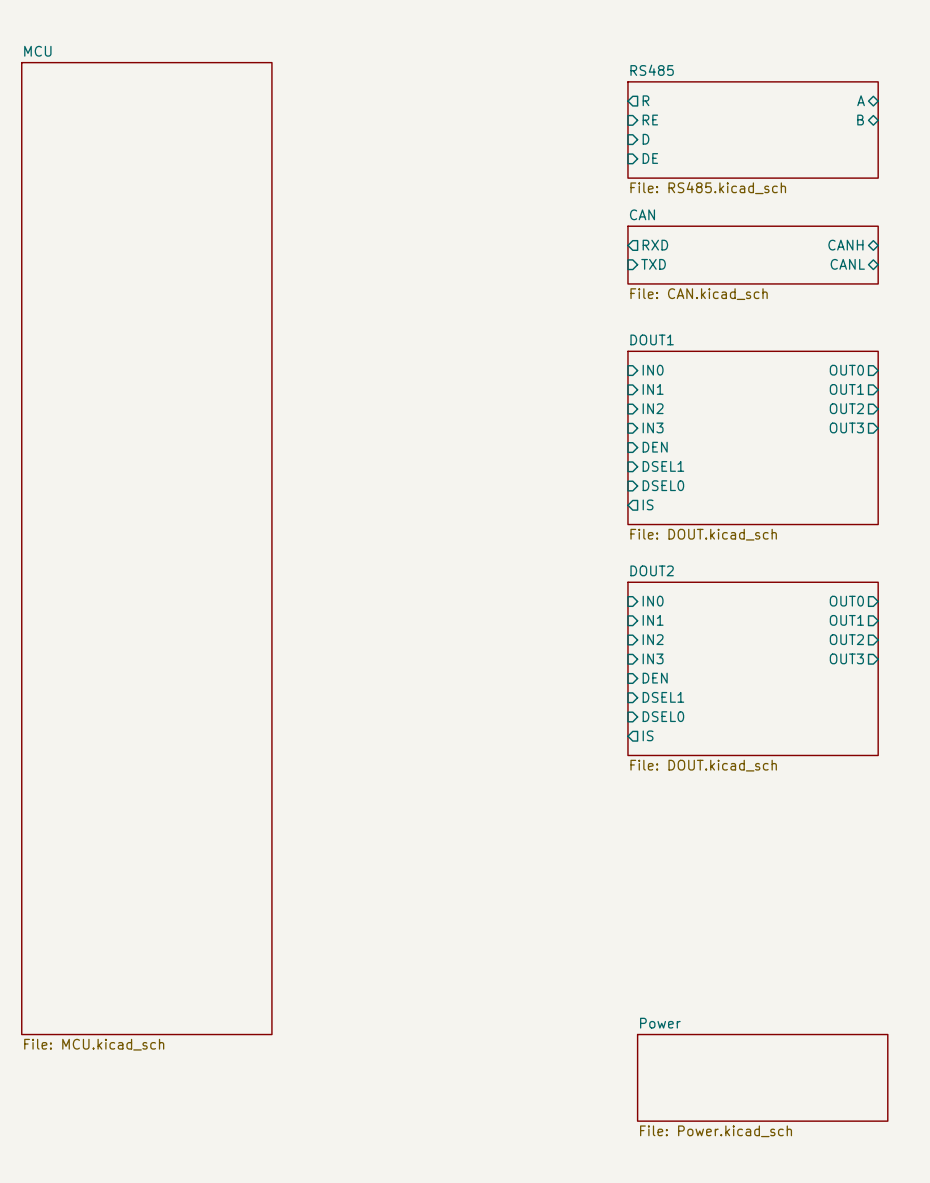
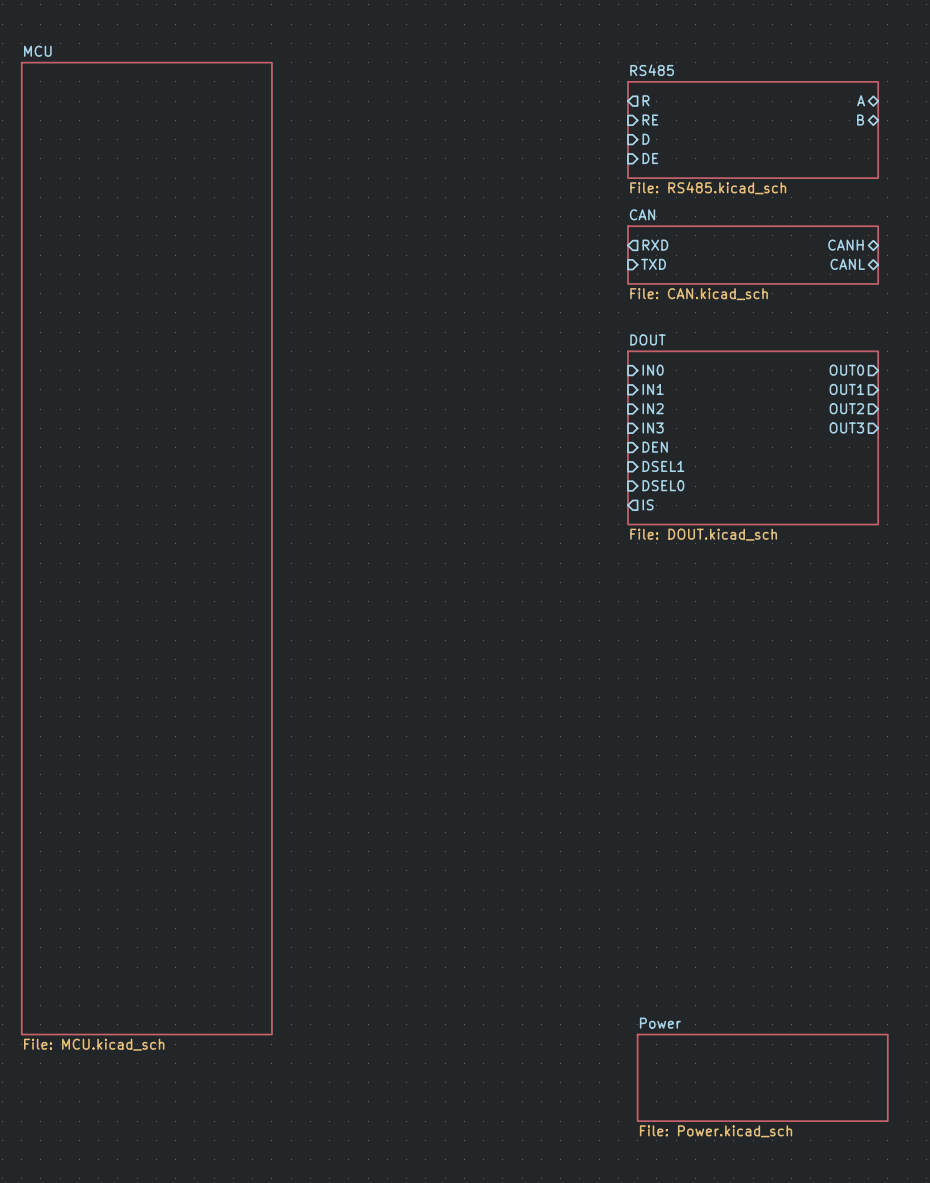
sheet DOUT1 name: DOUT1 (652, 339) -> DOUT (647, 339)
sheet pin: IN0 (653, 601) -> none
sheet pin: OUT0 (846, 601) -> none
sheet pin: IN1 (653, 620) -> none
sheet pin: OUT1 (846, 620) -> none
sheet pin: IN2 (653, 639) -> none
sheet pin: OUT2 (846, 639) -> none
sheet pin: IN3 (653, 658) -> none
sheet pin: OUT3 (846, 658) -> none
sheet DOUT2: File: DOUT.kicad_sch (753, 668) -> none
sheet pin: DEN (655, 678) -> none
sheet pin: DSEL1 (663, 697) -> none
sheet pin: DSEL0 (663, 716) -> none
sheet pin: IS (648, 735) -> none

